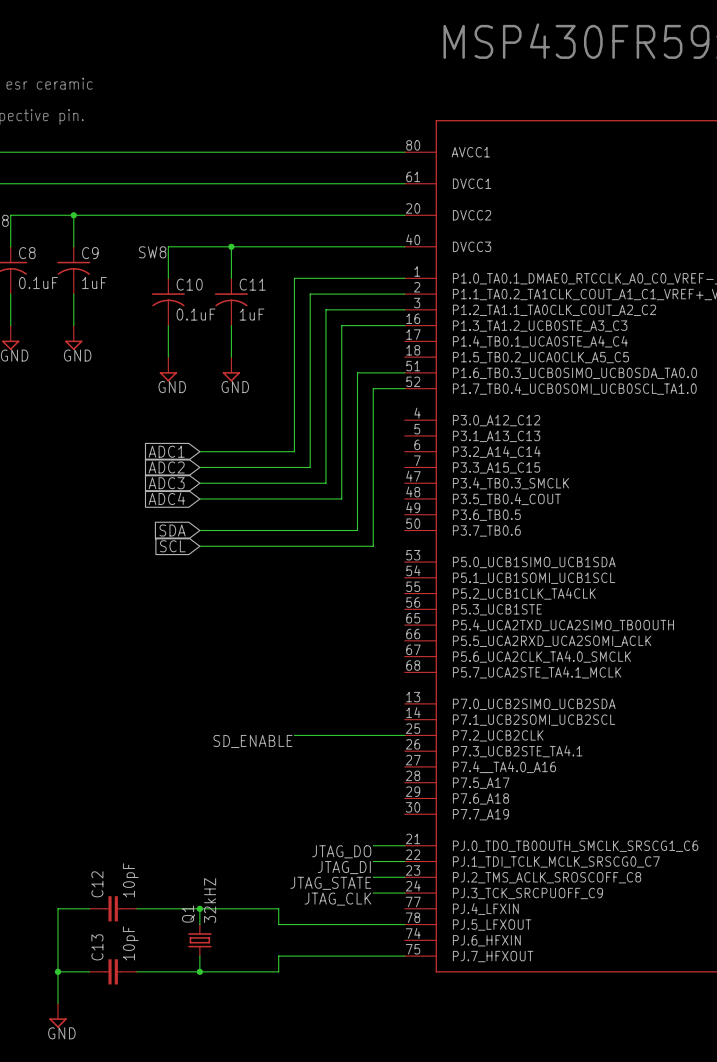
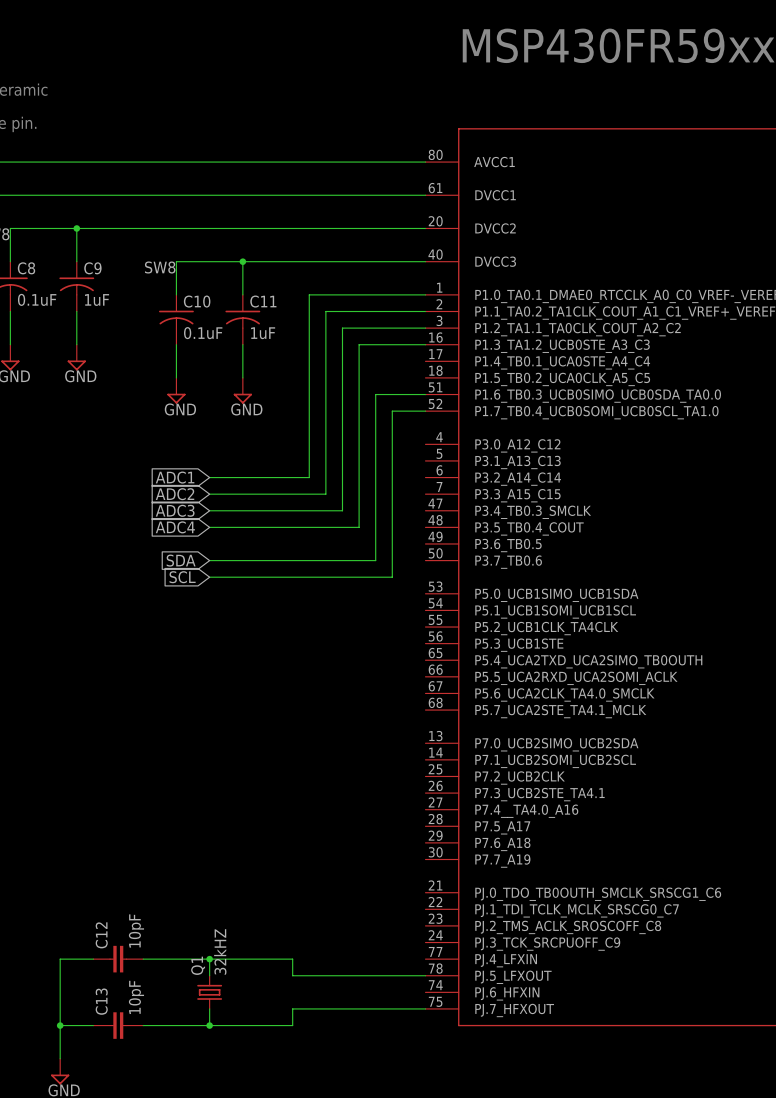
wire: (294, 735) (404, 735) -> none
label: SD_ENABLE (252, 741) -> none
wire: (373, 845) (404, 845) -> none
label: JTAG_DO (341, 851) -> none
wire: (373, 861) (404, 861) -> none
label: JTAG_DI (344, 867) -> none
wire: (373, 877) (404, 877) -> none
label: JTAG_STATE (330, 883) -> none
wire: (373, 893) (404, 893) -> none
label: JTAG_CLK (337, 899) -> none

